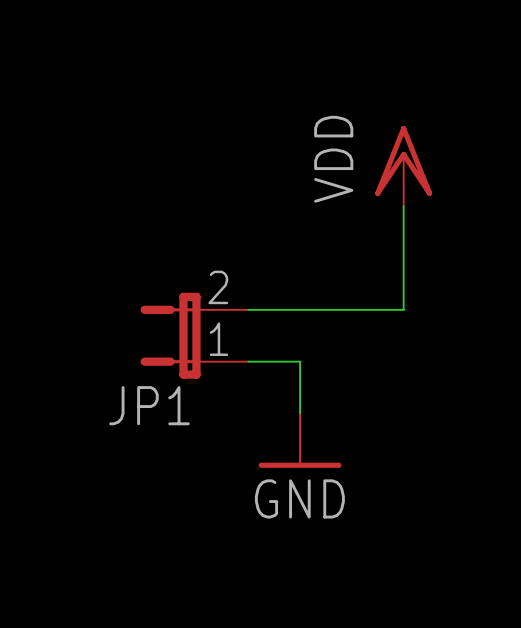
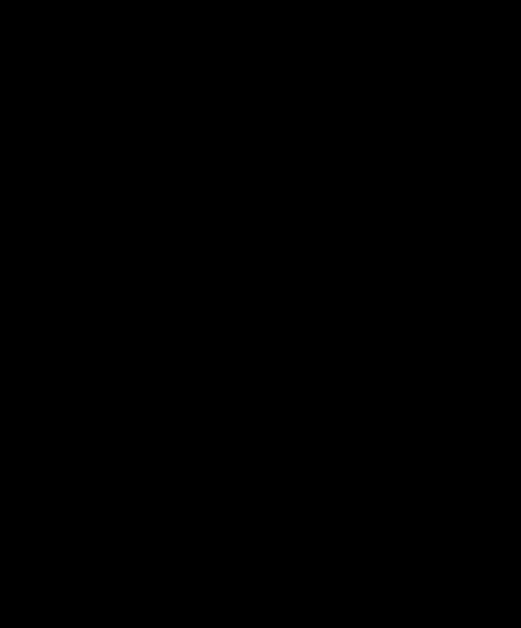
power symbol: VDD (403, 166) -> none
wire: (403, 206) (403, 309) (248, 309) -> none
JP1: (194, 335) -> none
wire: (248, 361) (300, 361) (300, 413) -> none
power symbol: GND (300, 440) -> none

